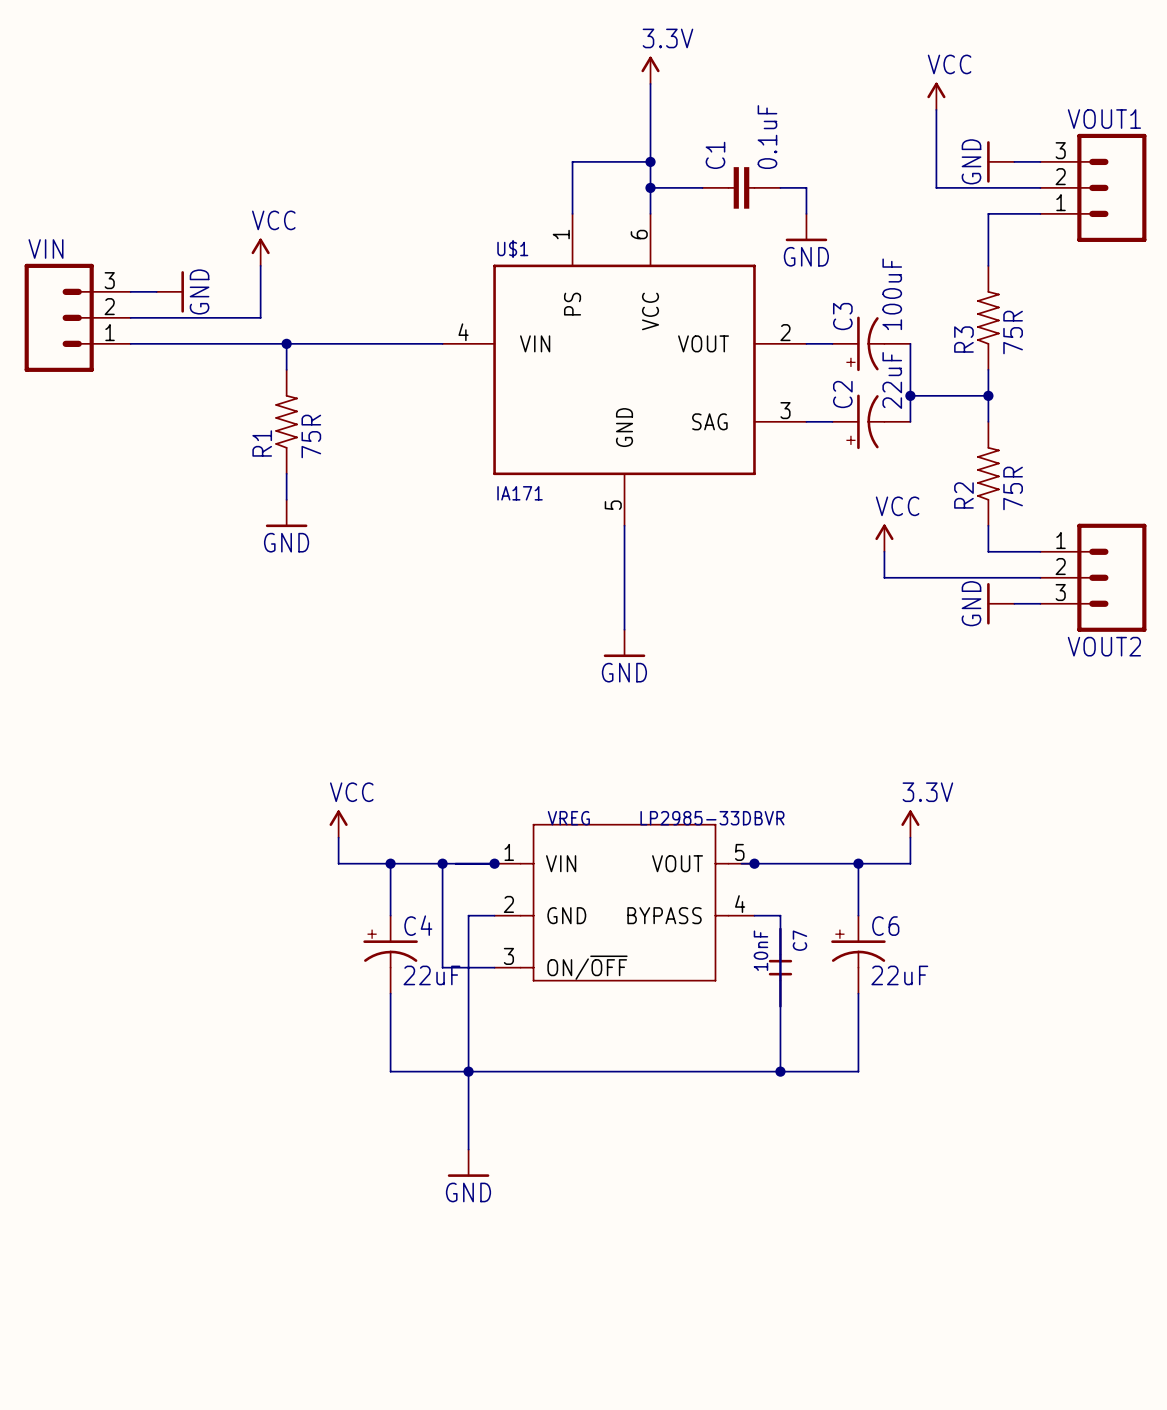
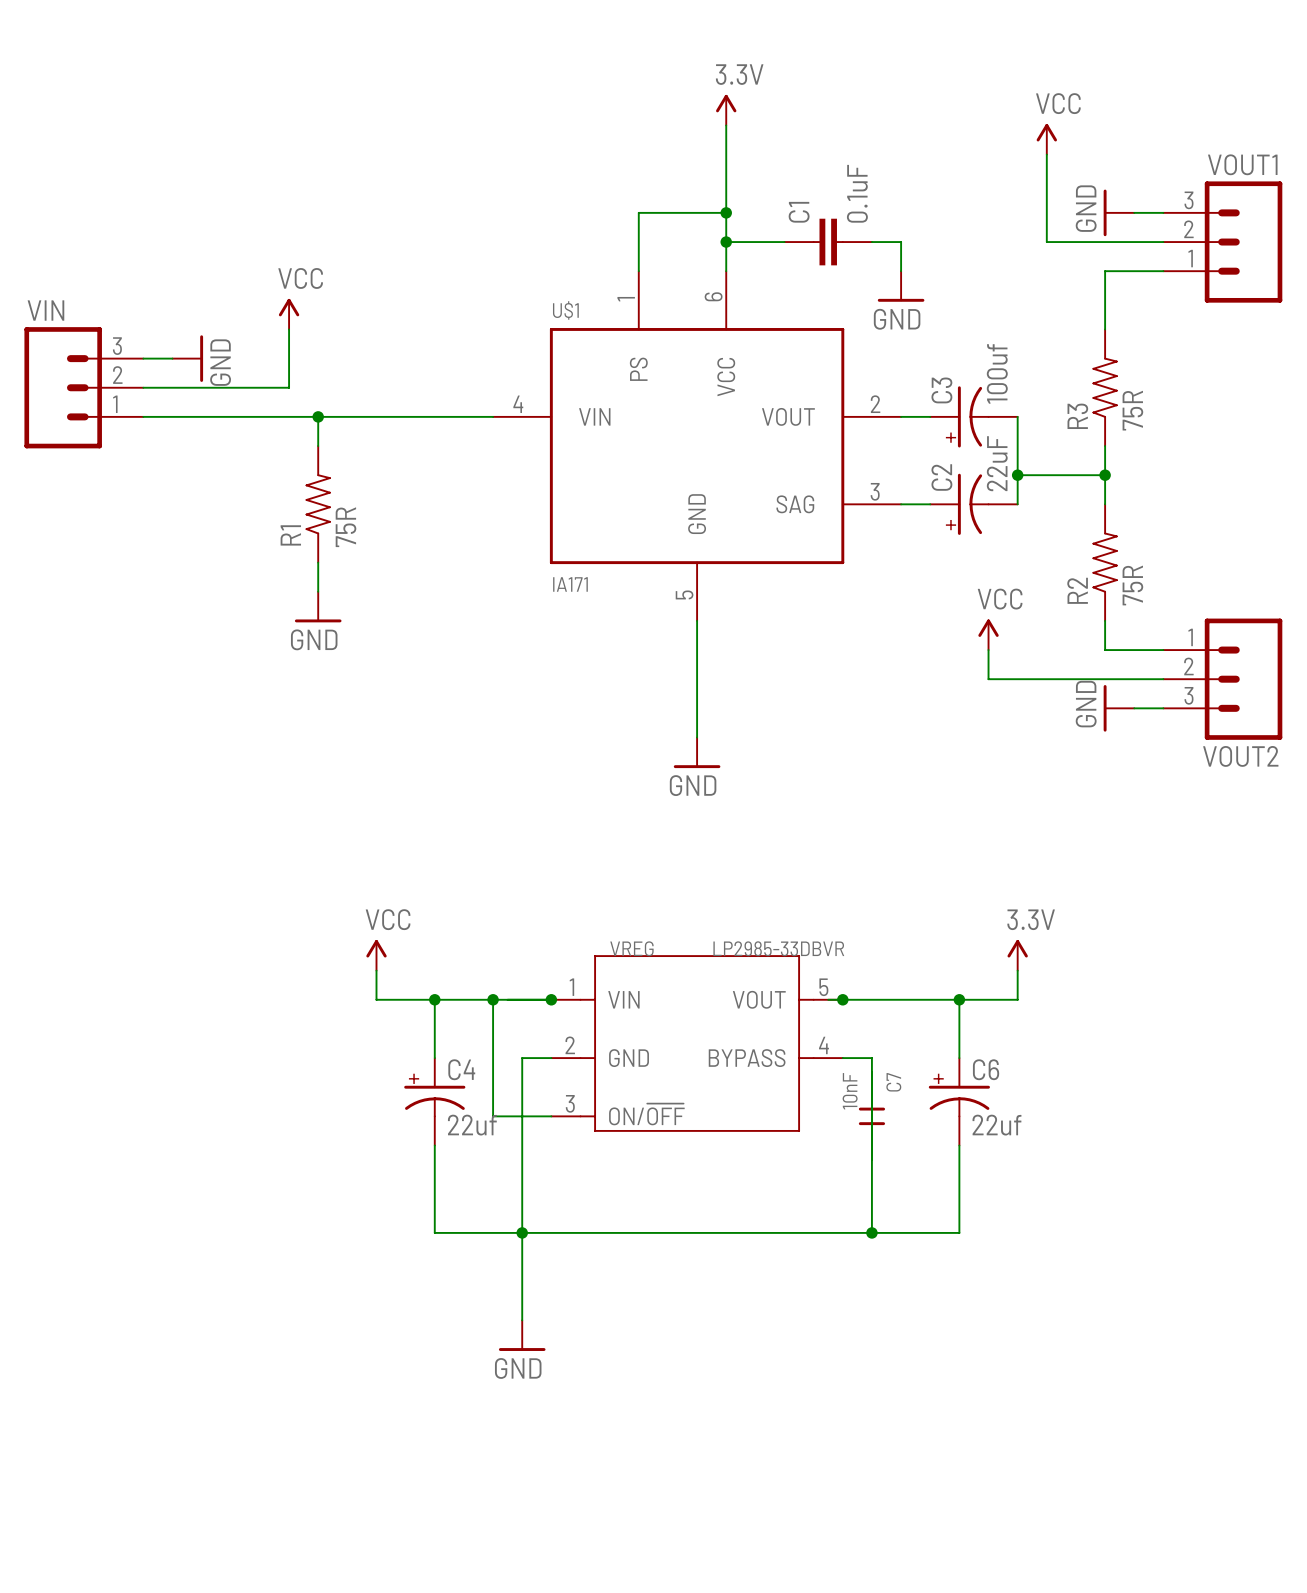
C3 value: 100uF (892, 294) -> 100uf (997, 373)
C4 value: 22uF (431, 975) -> 22uf (472, 1125)
C6 value: 22uF (899, 975) -> 22uf (996, 1125)

